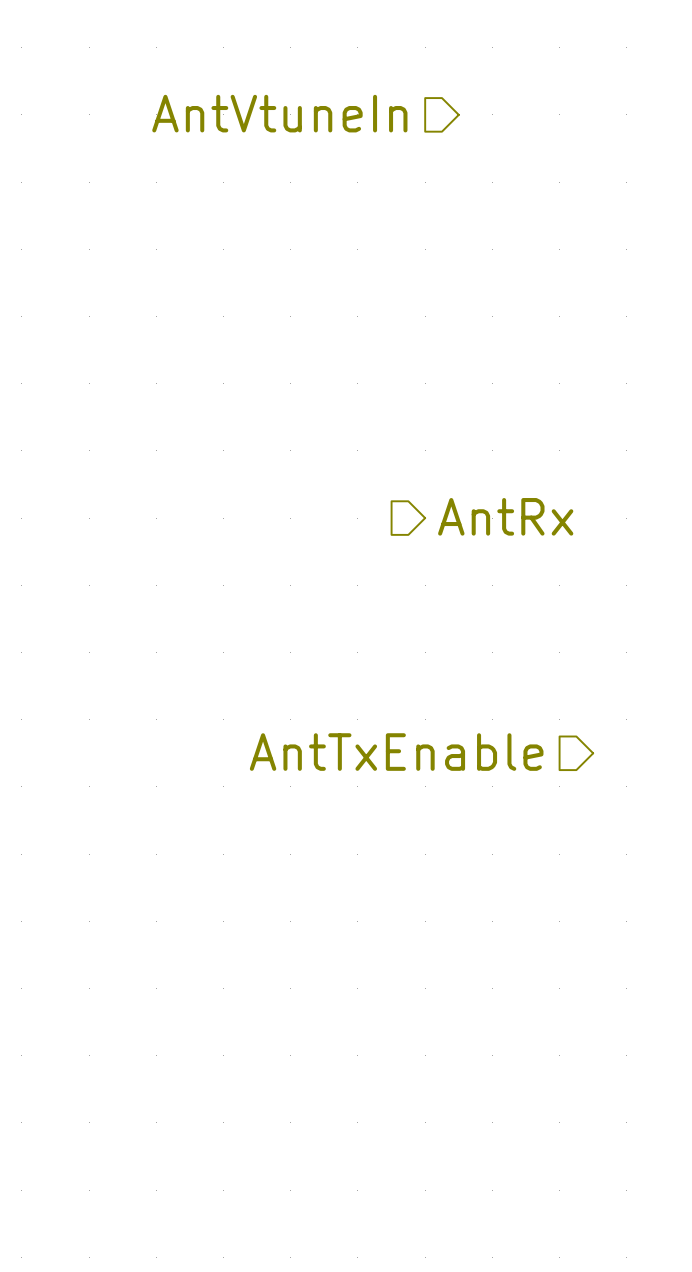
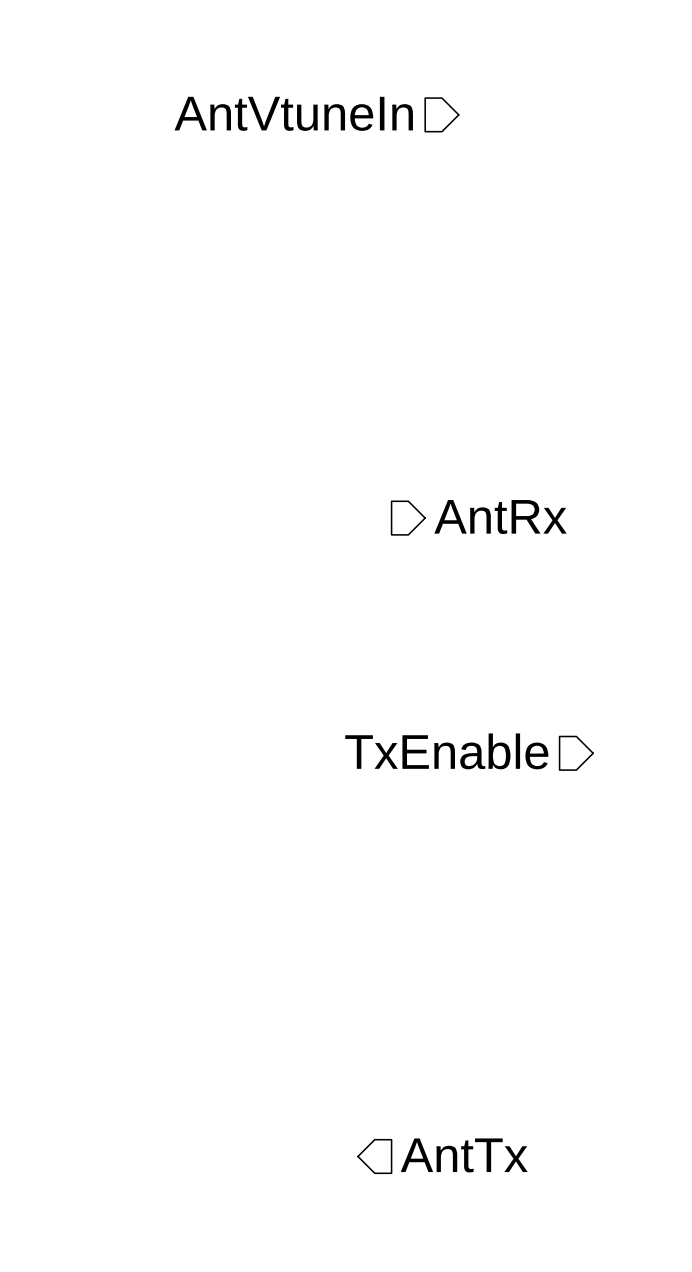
hierarchical label: AntTxEnable (396, 752) -> TxEnable (446, 751)
hierarchical label: none -> AntTx (464, 1155)

